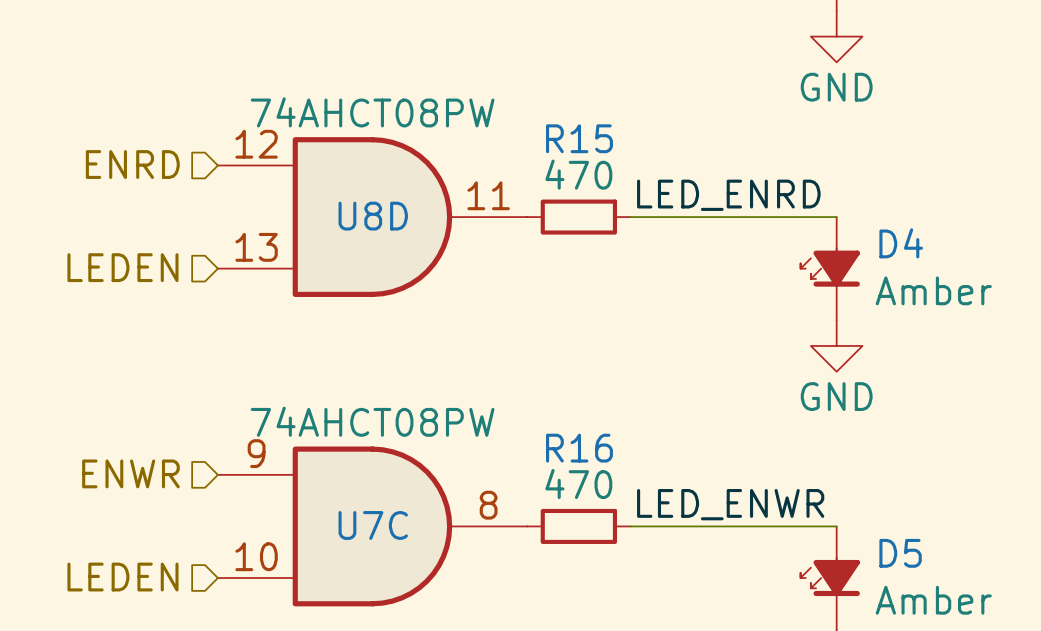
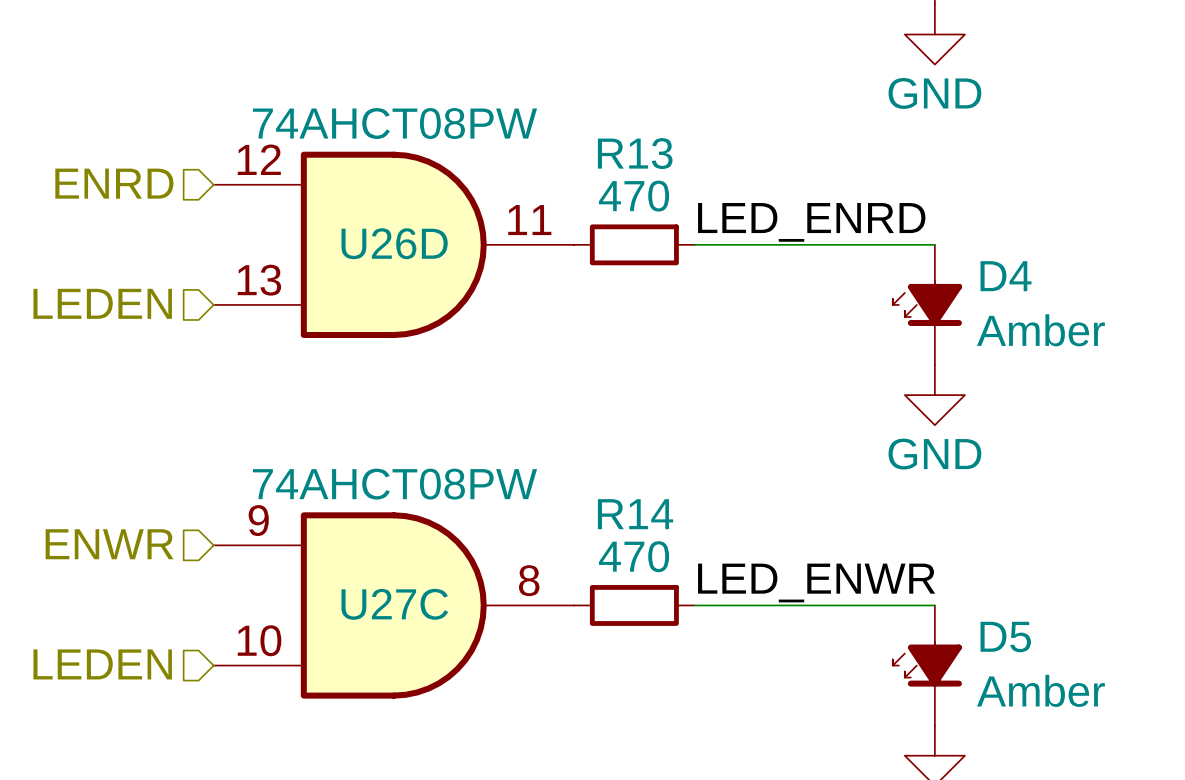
R15 name: R15 (579, 138) -> R13 (635, 153)
U8D name: U8D (373, 216) -> U26D (394, 243)
R16 name: R16 (579, 448) -> R14 (635, 514)
U7C name: U7C (373, 525) -> U27C (394, 604)

